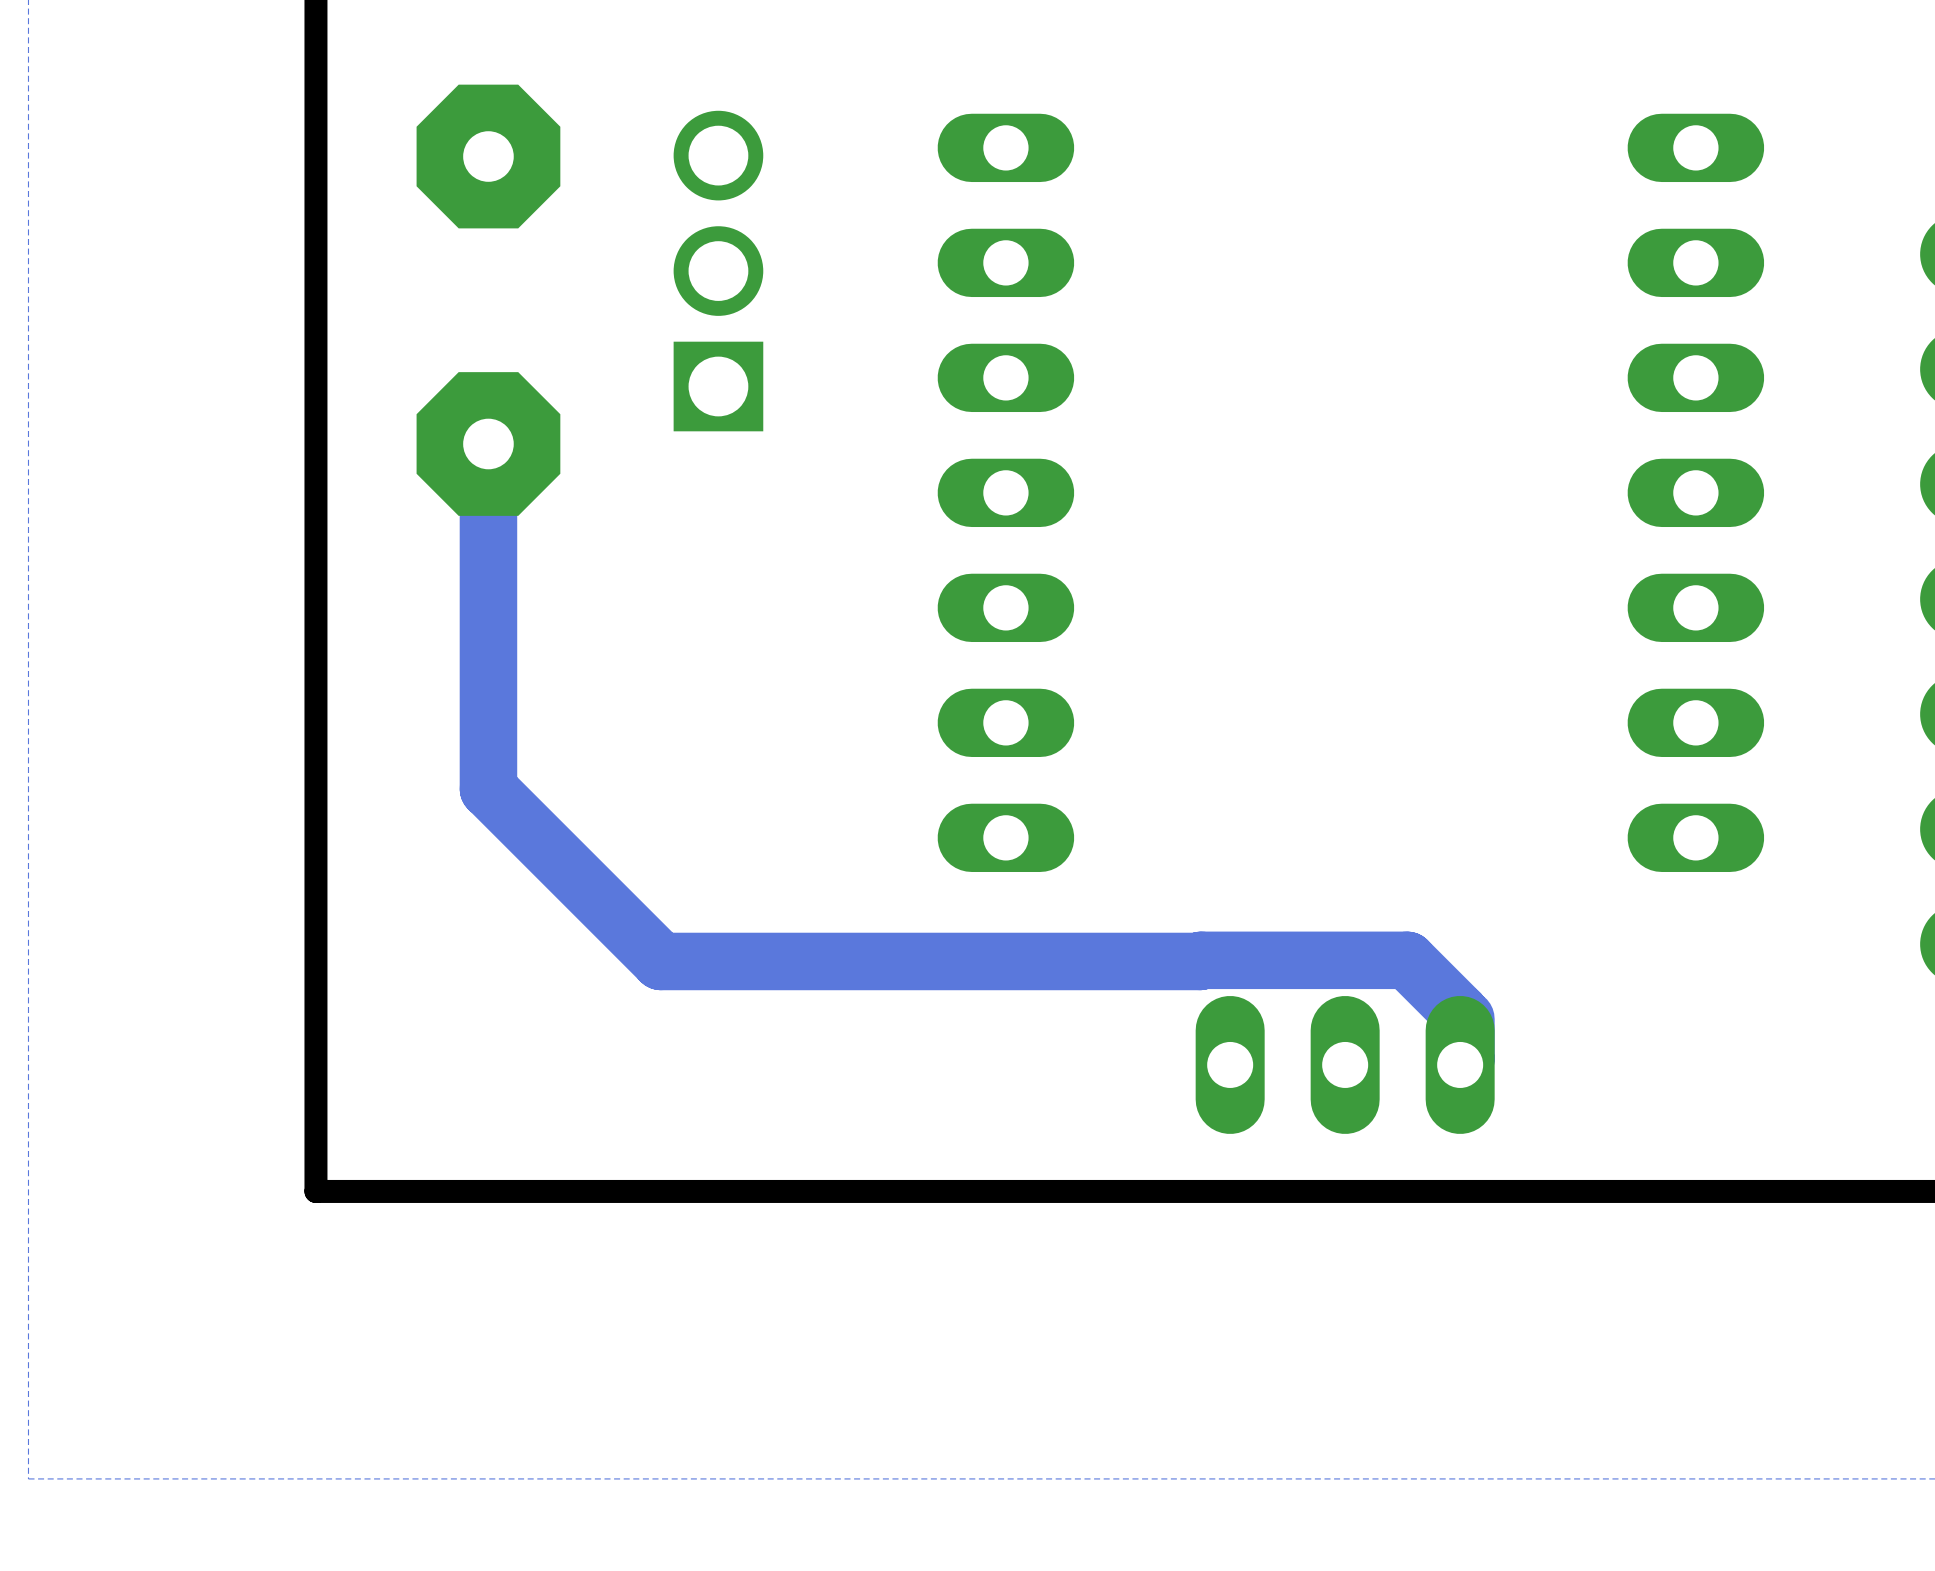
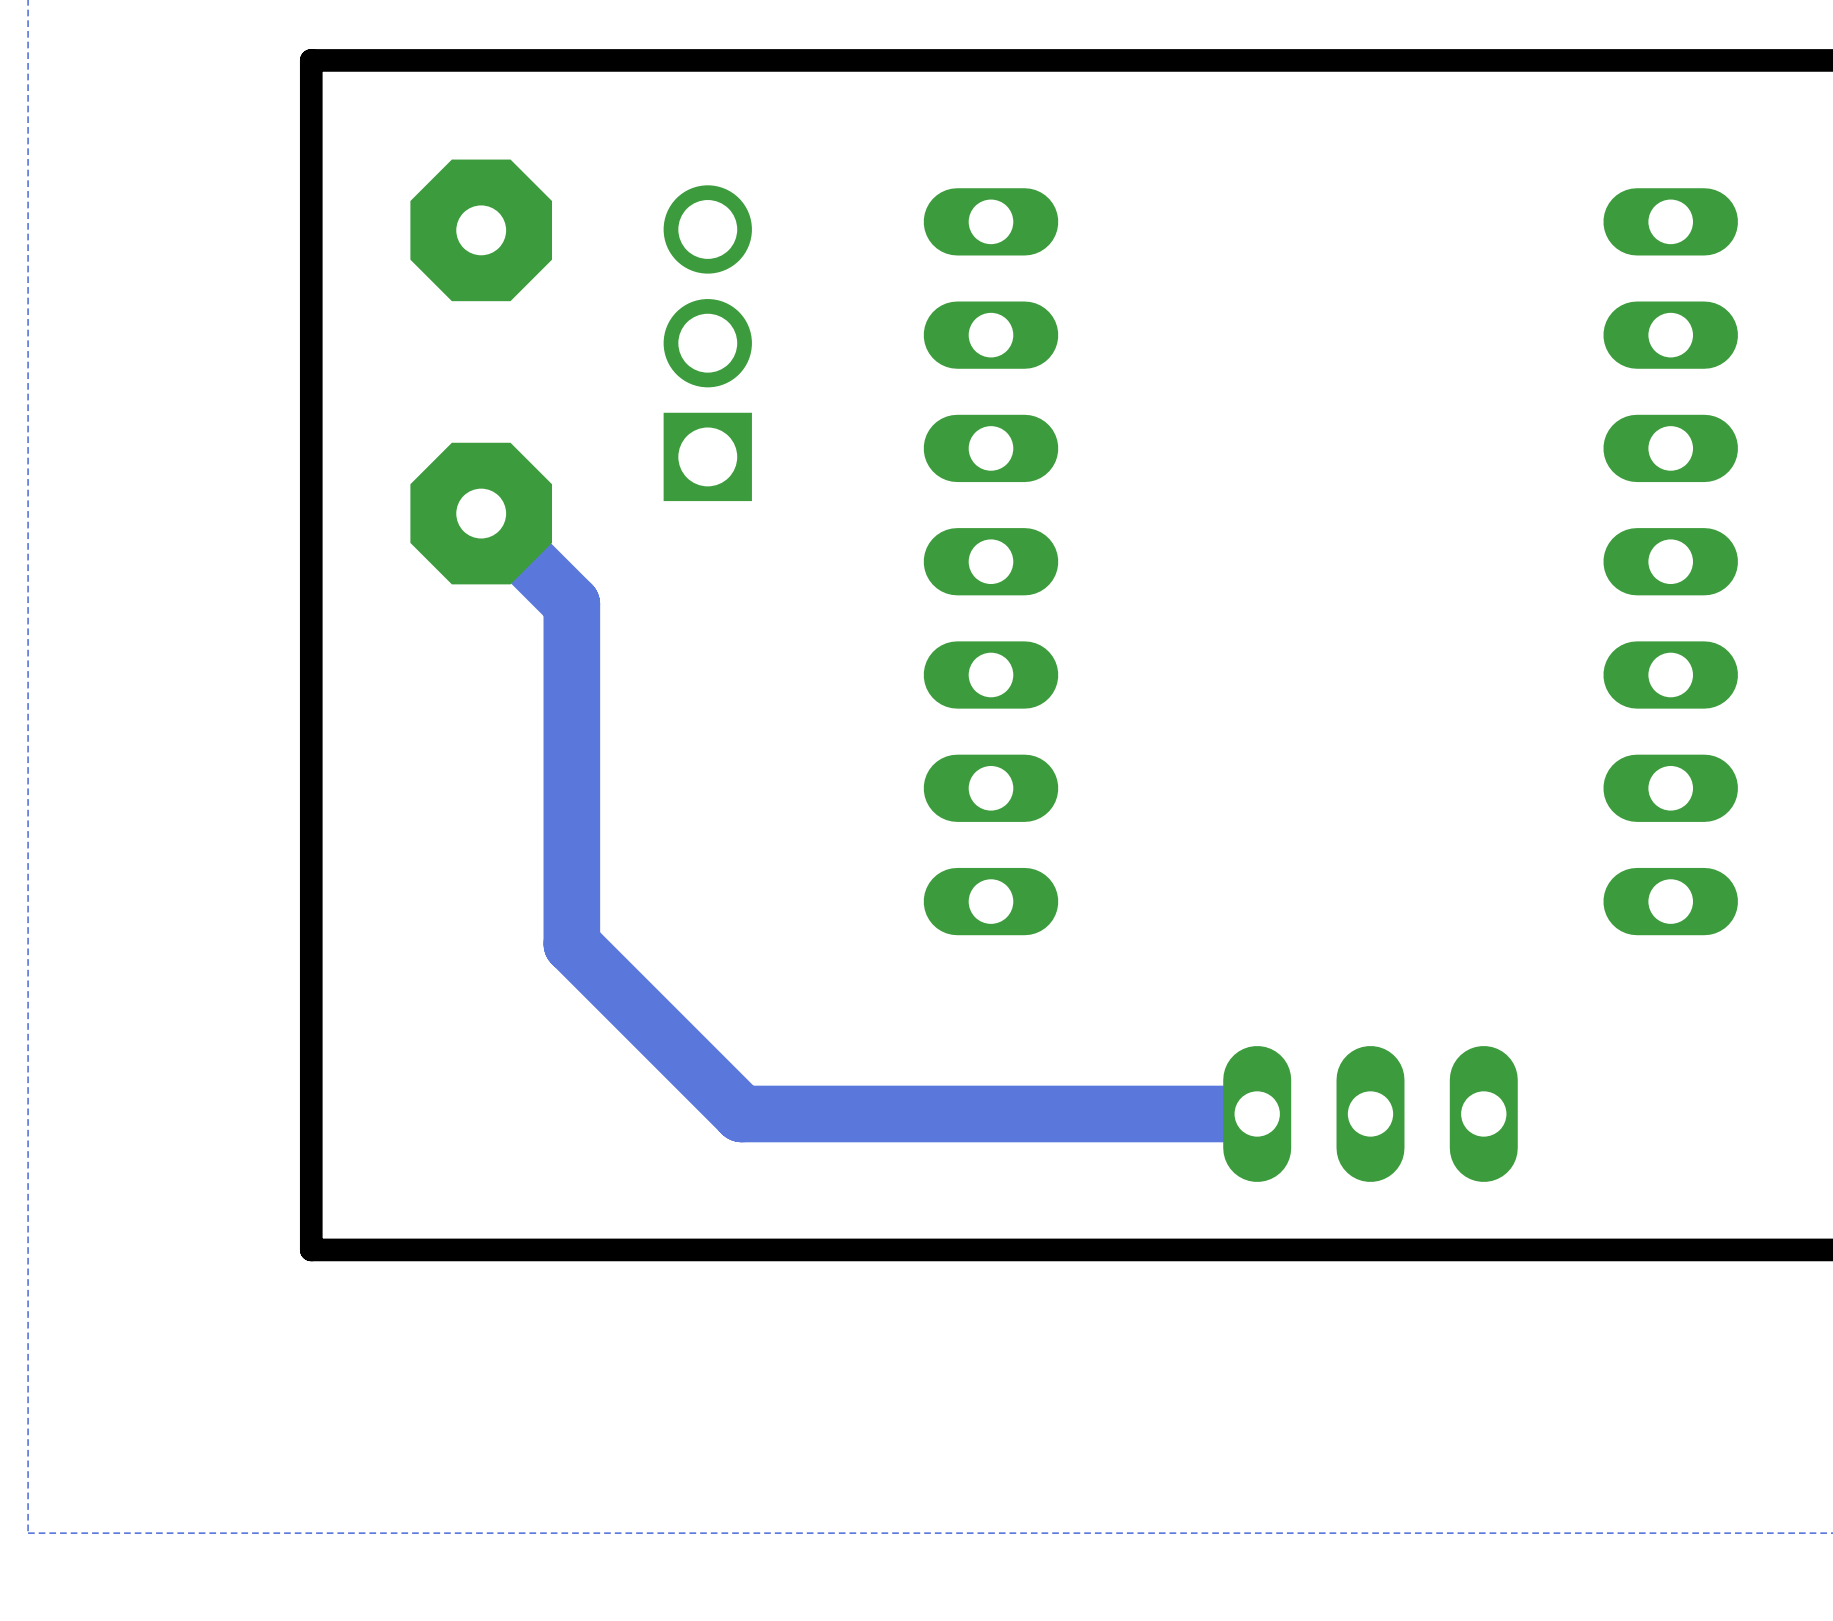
track: (488, 444) (488, 788) (580, 880) -> (481, 513) (571, 604) (571, 944)
track: (660, 961) (1407, 960) (1460, 1013) (1460, 1064) (1465, 1059) (1465, 1018) -> (651, 1023) (741, 1113) (1257, 1113)
part position: (1345, 1064) -> (1370, 1113)

